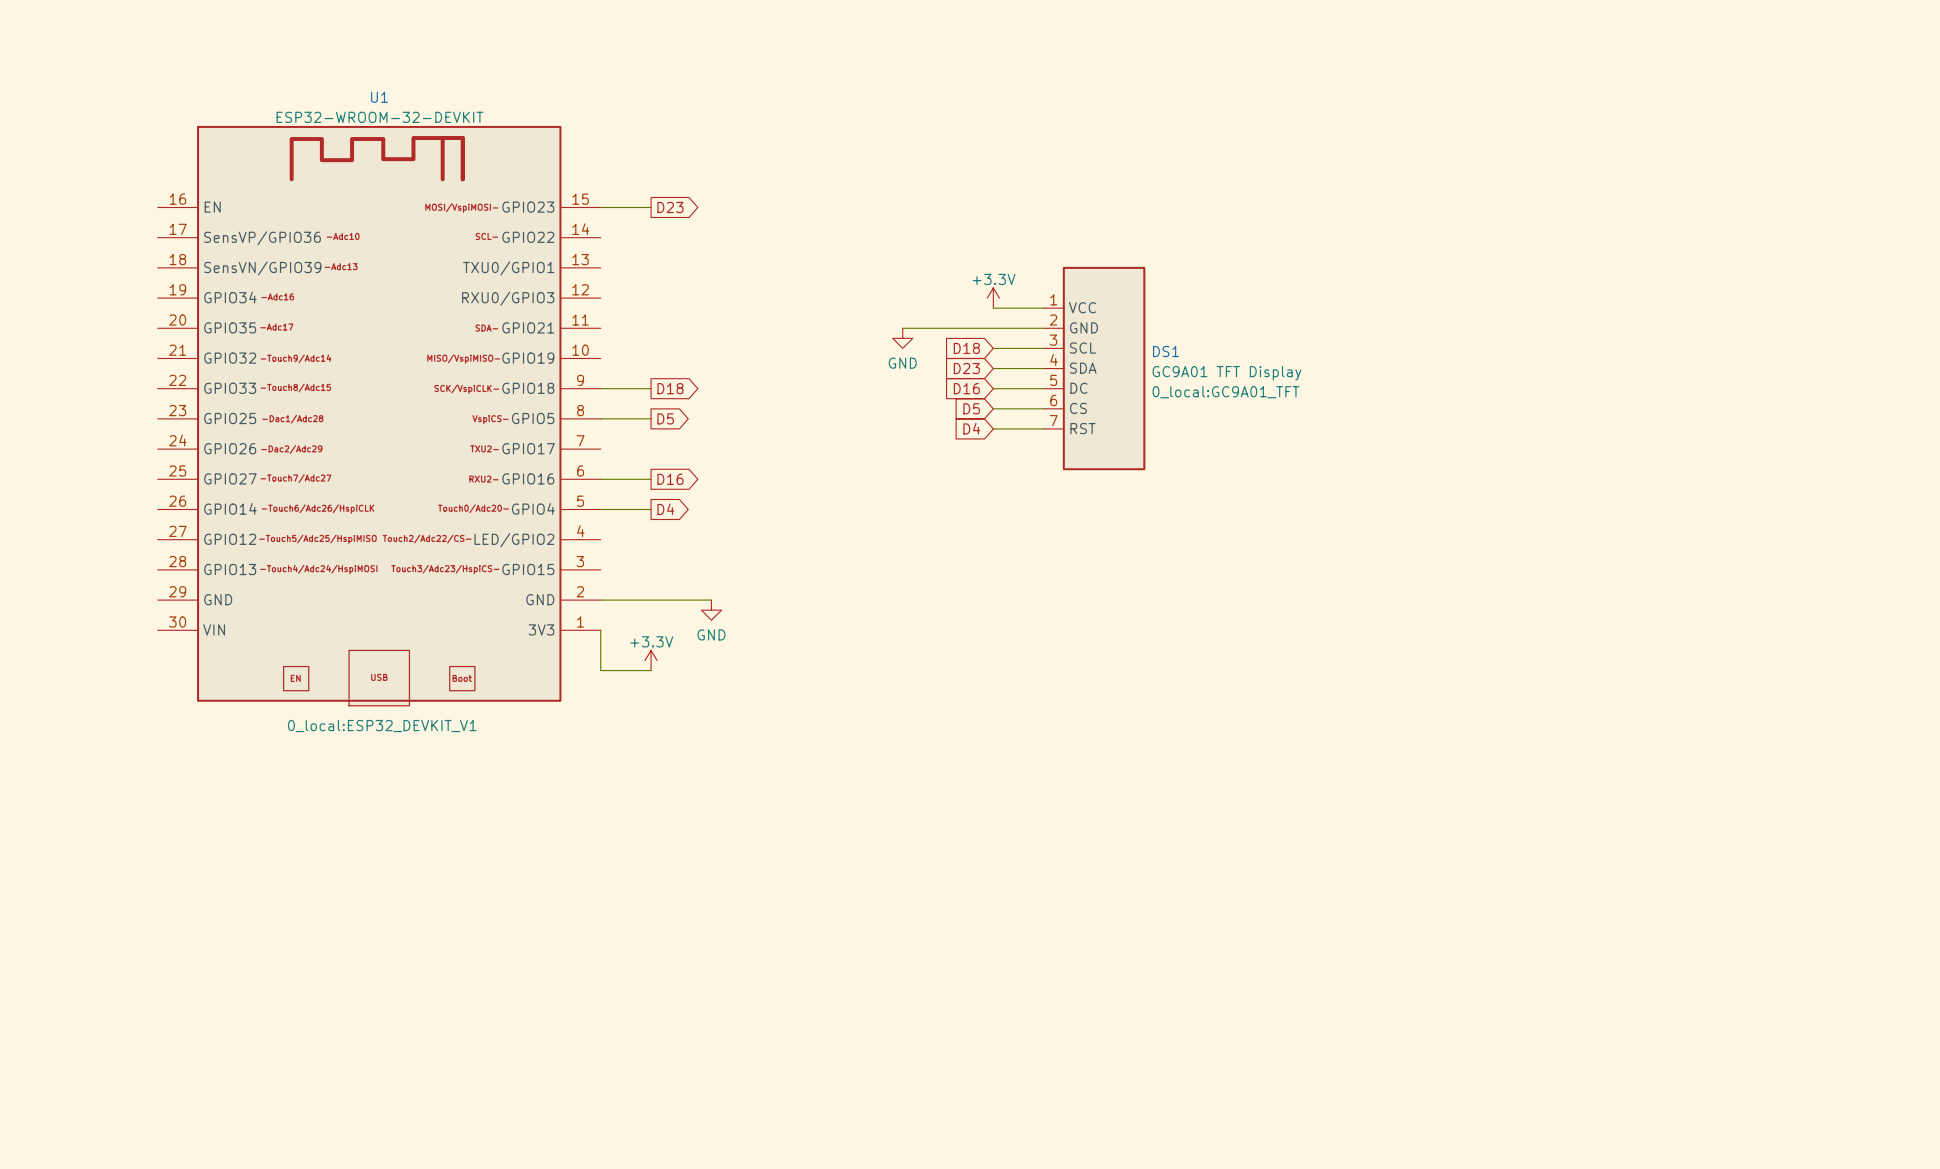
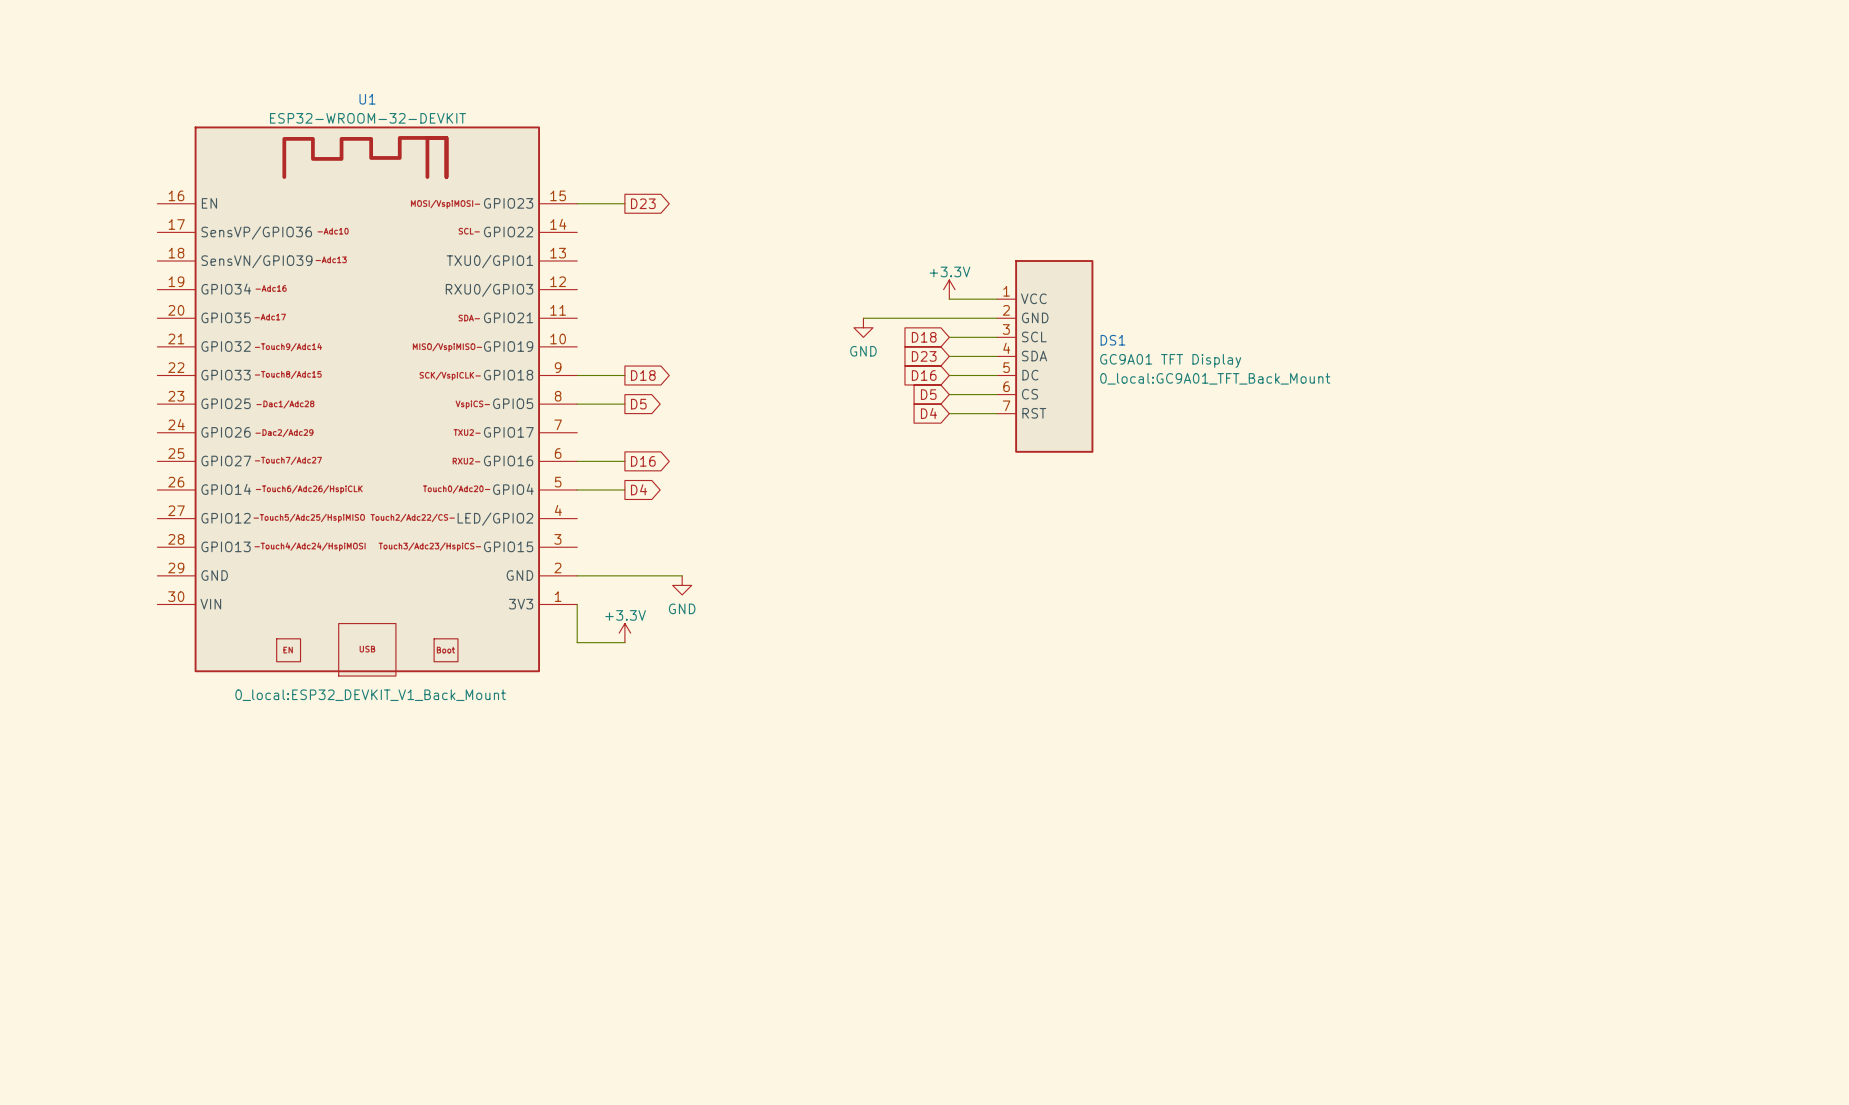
DS1 text: 0_local:GC9A01_TFT (1225, 392) -> 0_local:GC9A01_TFT_Back_Mount (1215, 378)
U1 text: 0_local:ESP32_DEVKIT_V1 (382, 726) -> 0_local:ESP32_DEVKIT_V1_Back_Mount (370, 695)

